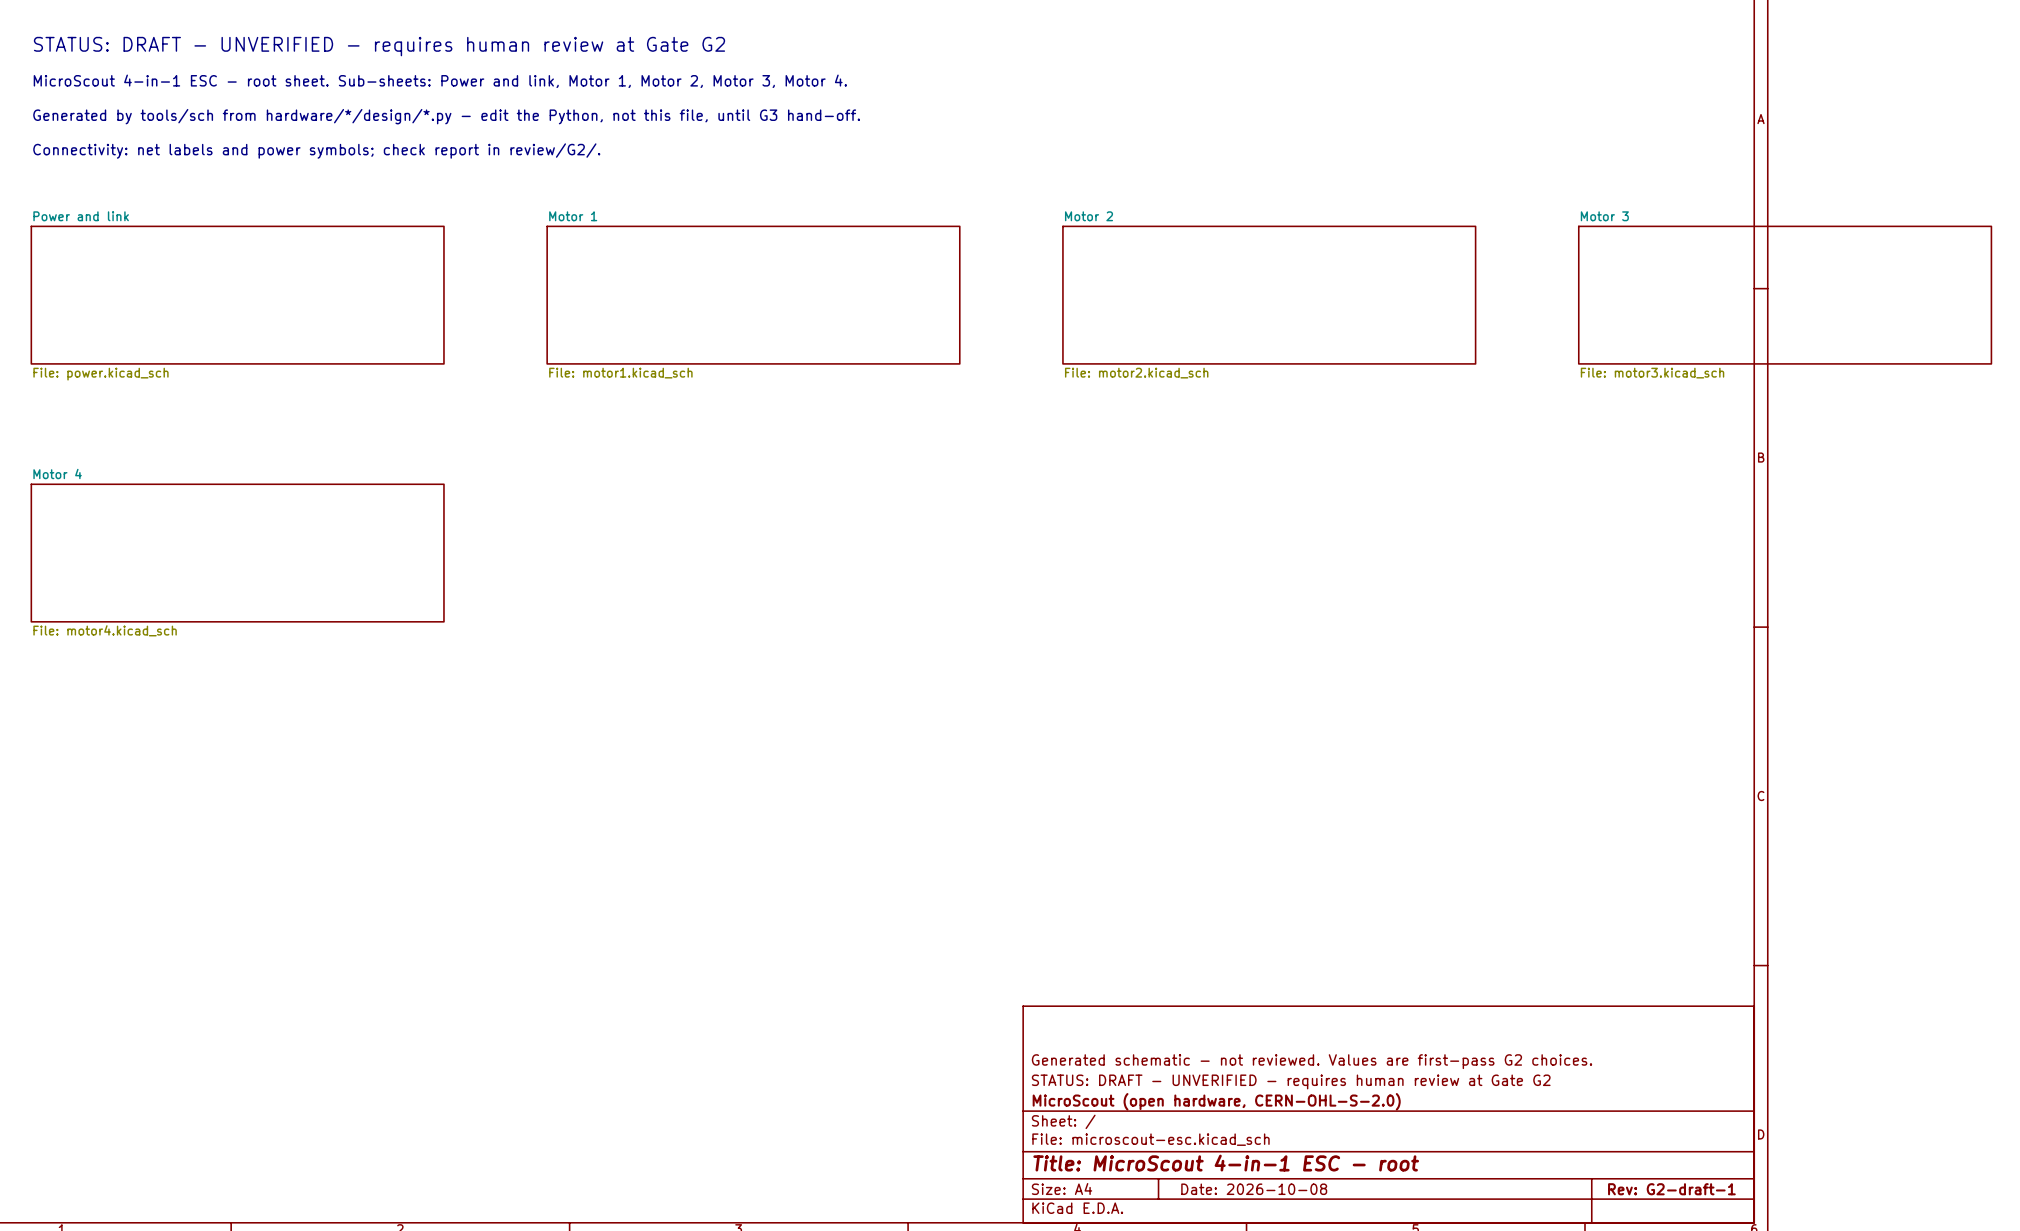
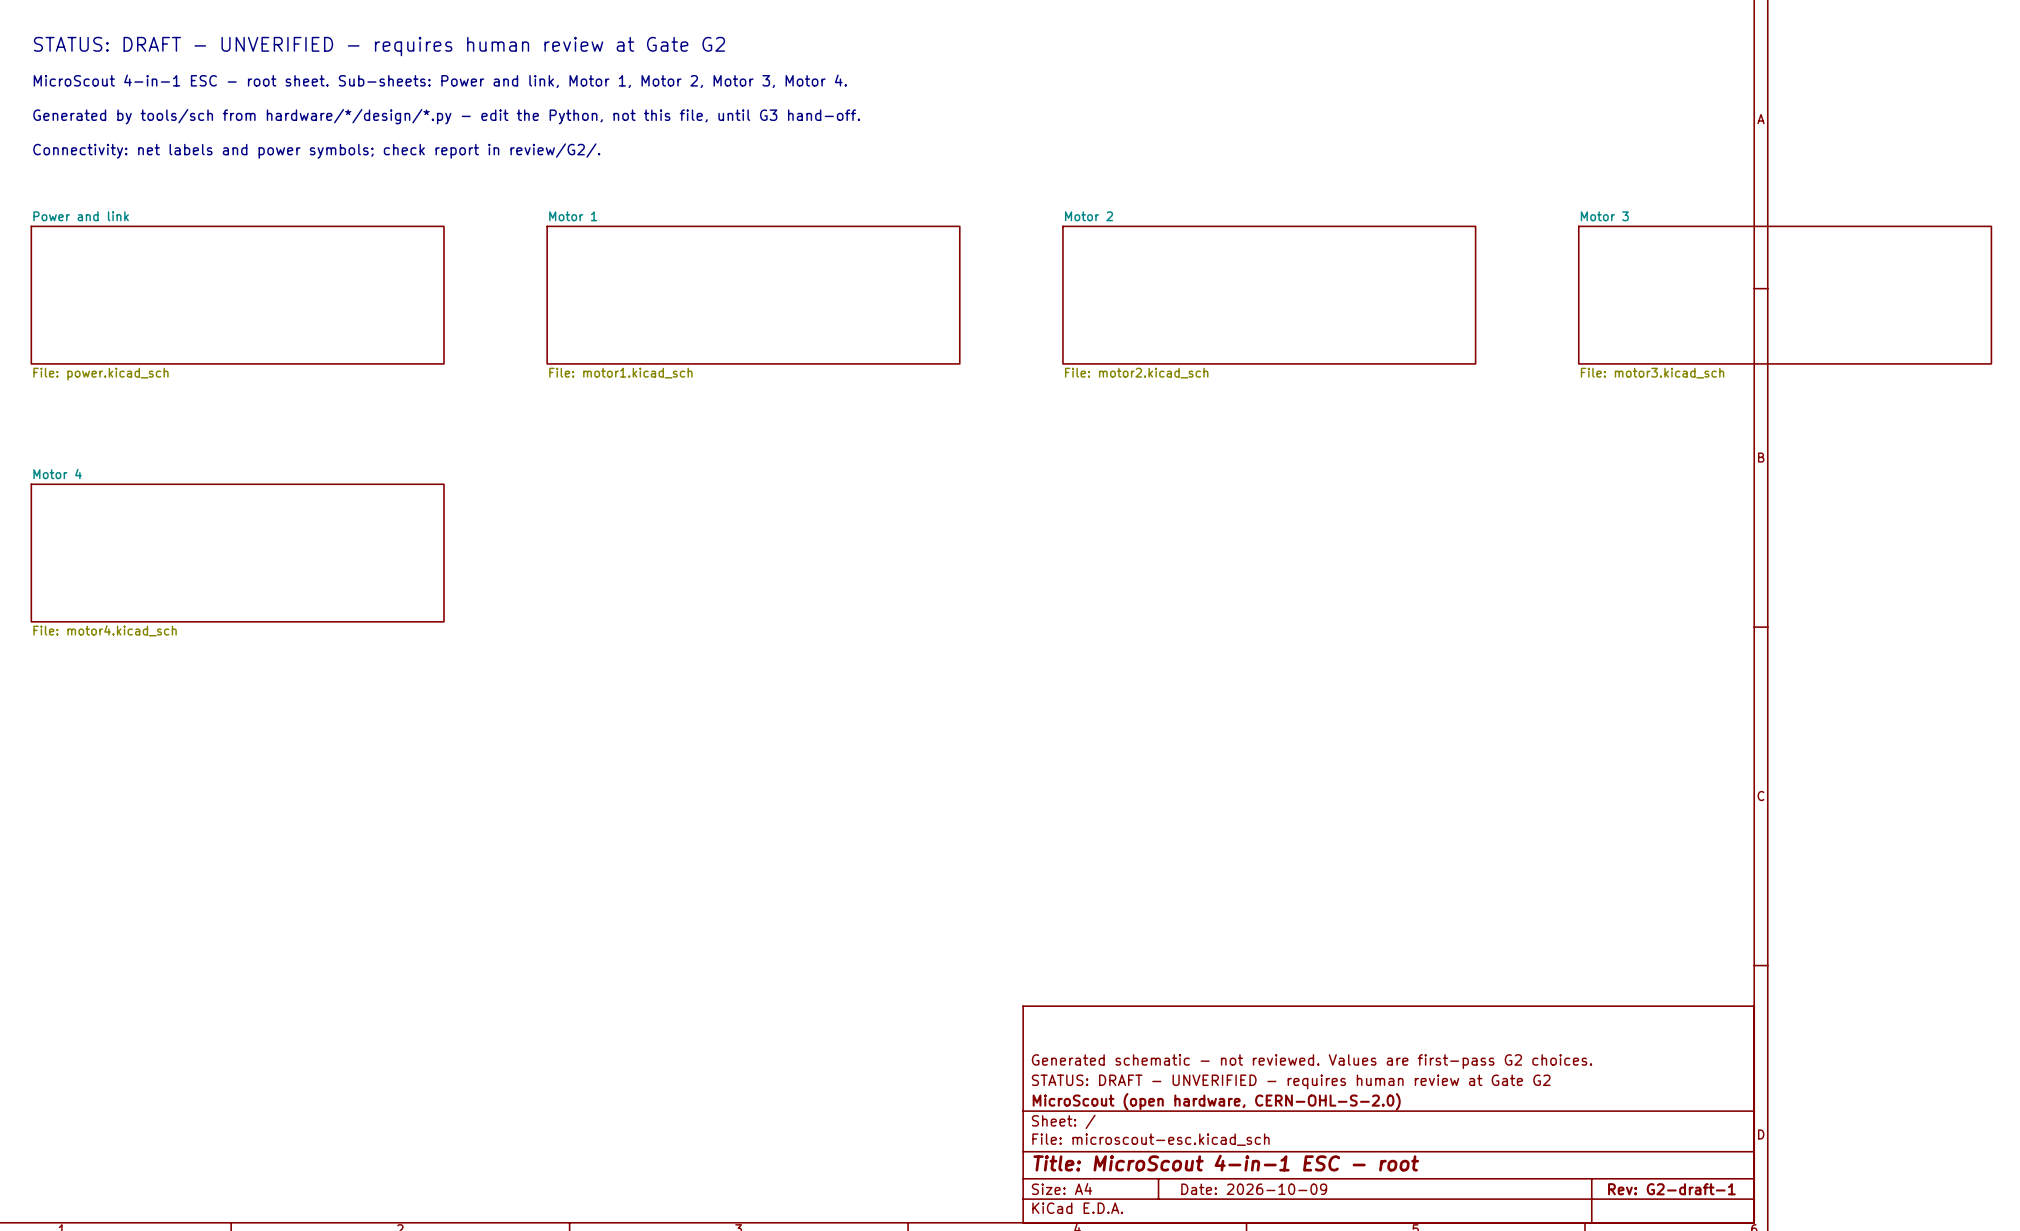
title block: Date: 2026-10-08 (1254, 1189) -> Date: 2026-10-09 (1254, 1189)

